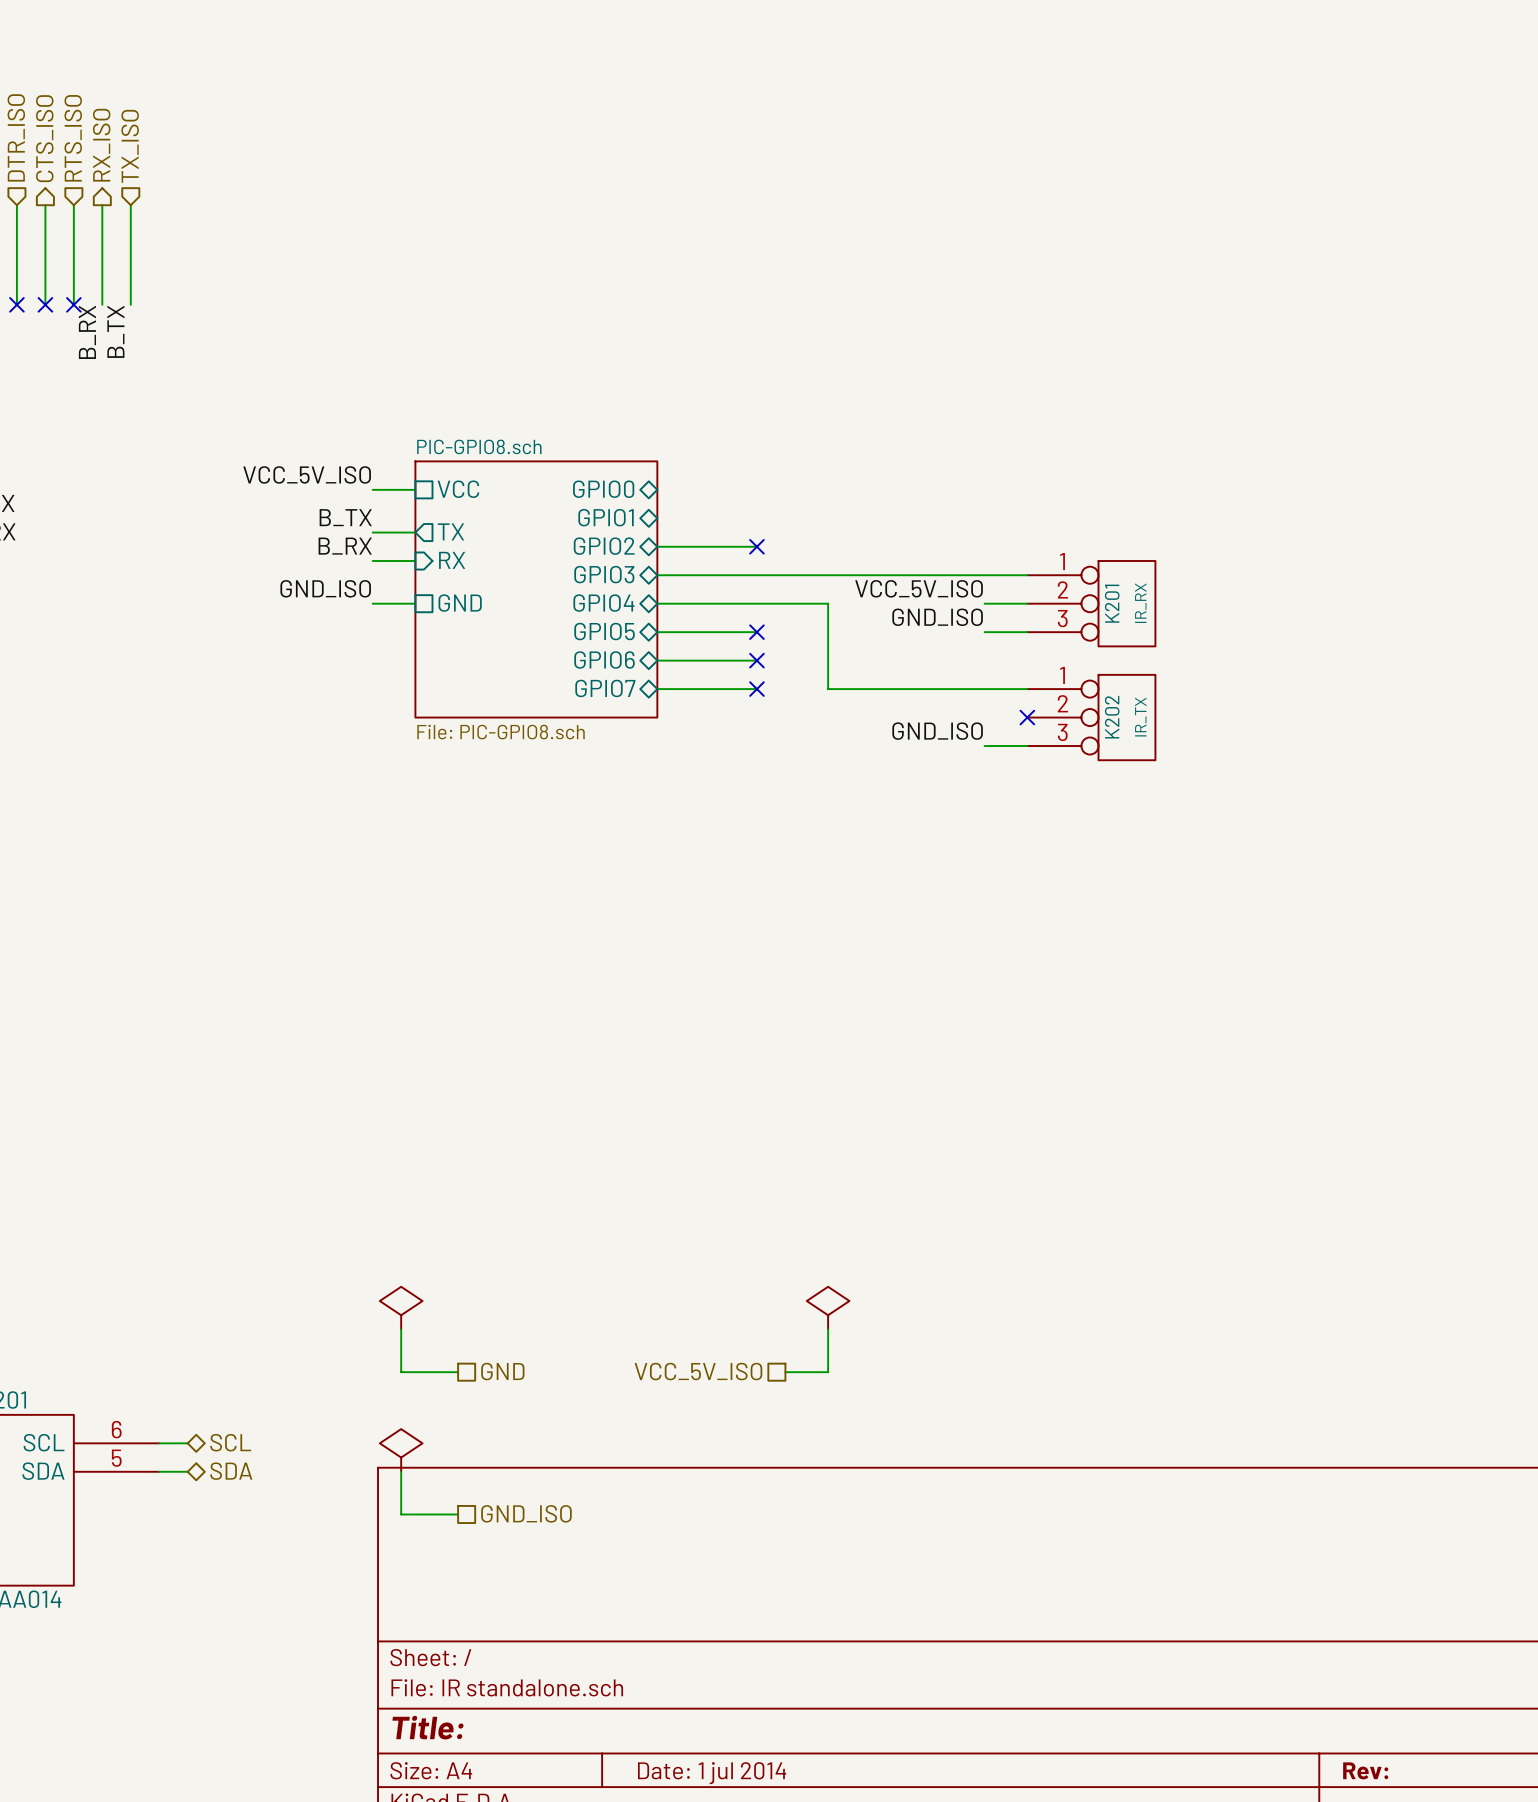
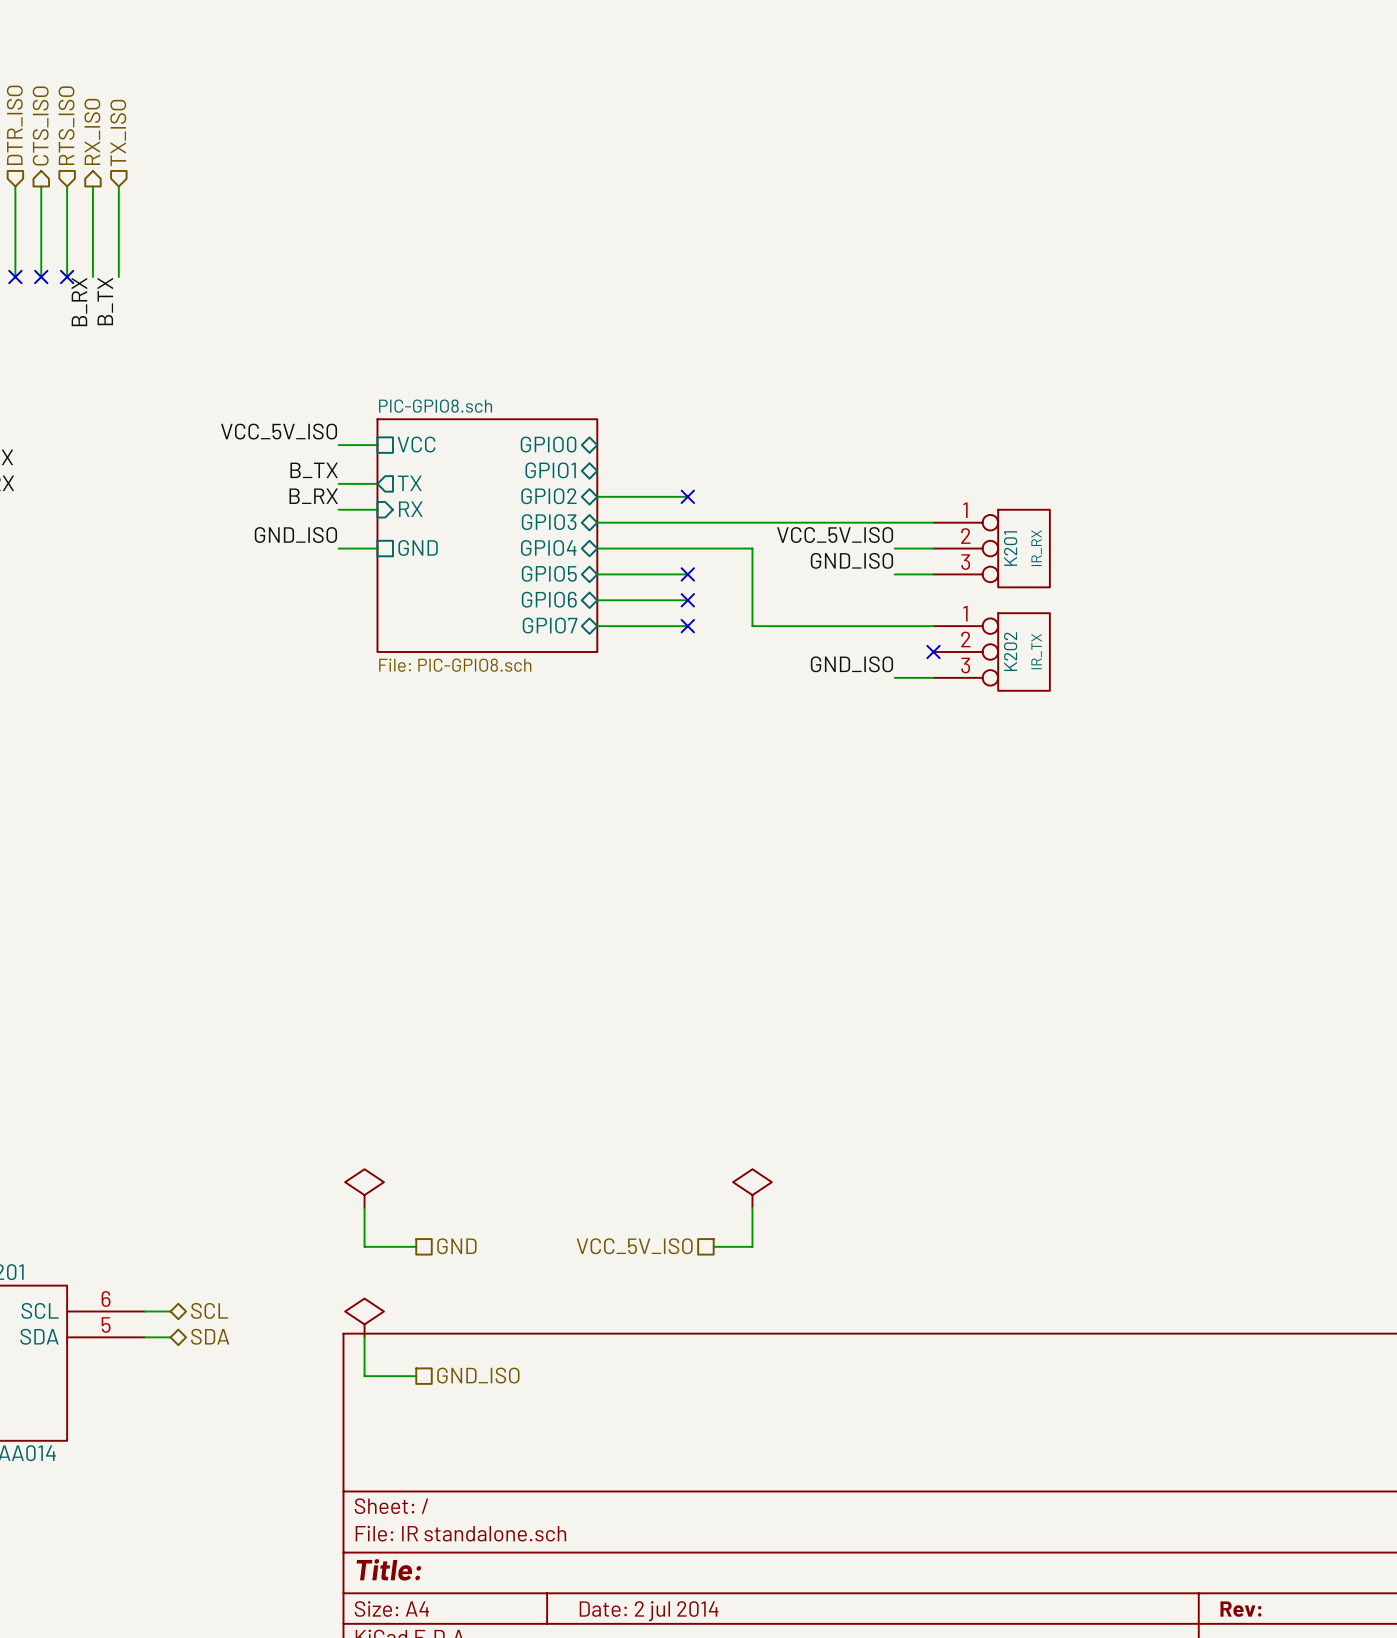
title block: Date: 1 jul 2014 (712, 1773) -> Date: 2 jul 2014 (649, 1611)

